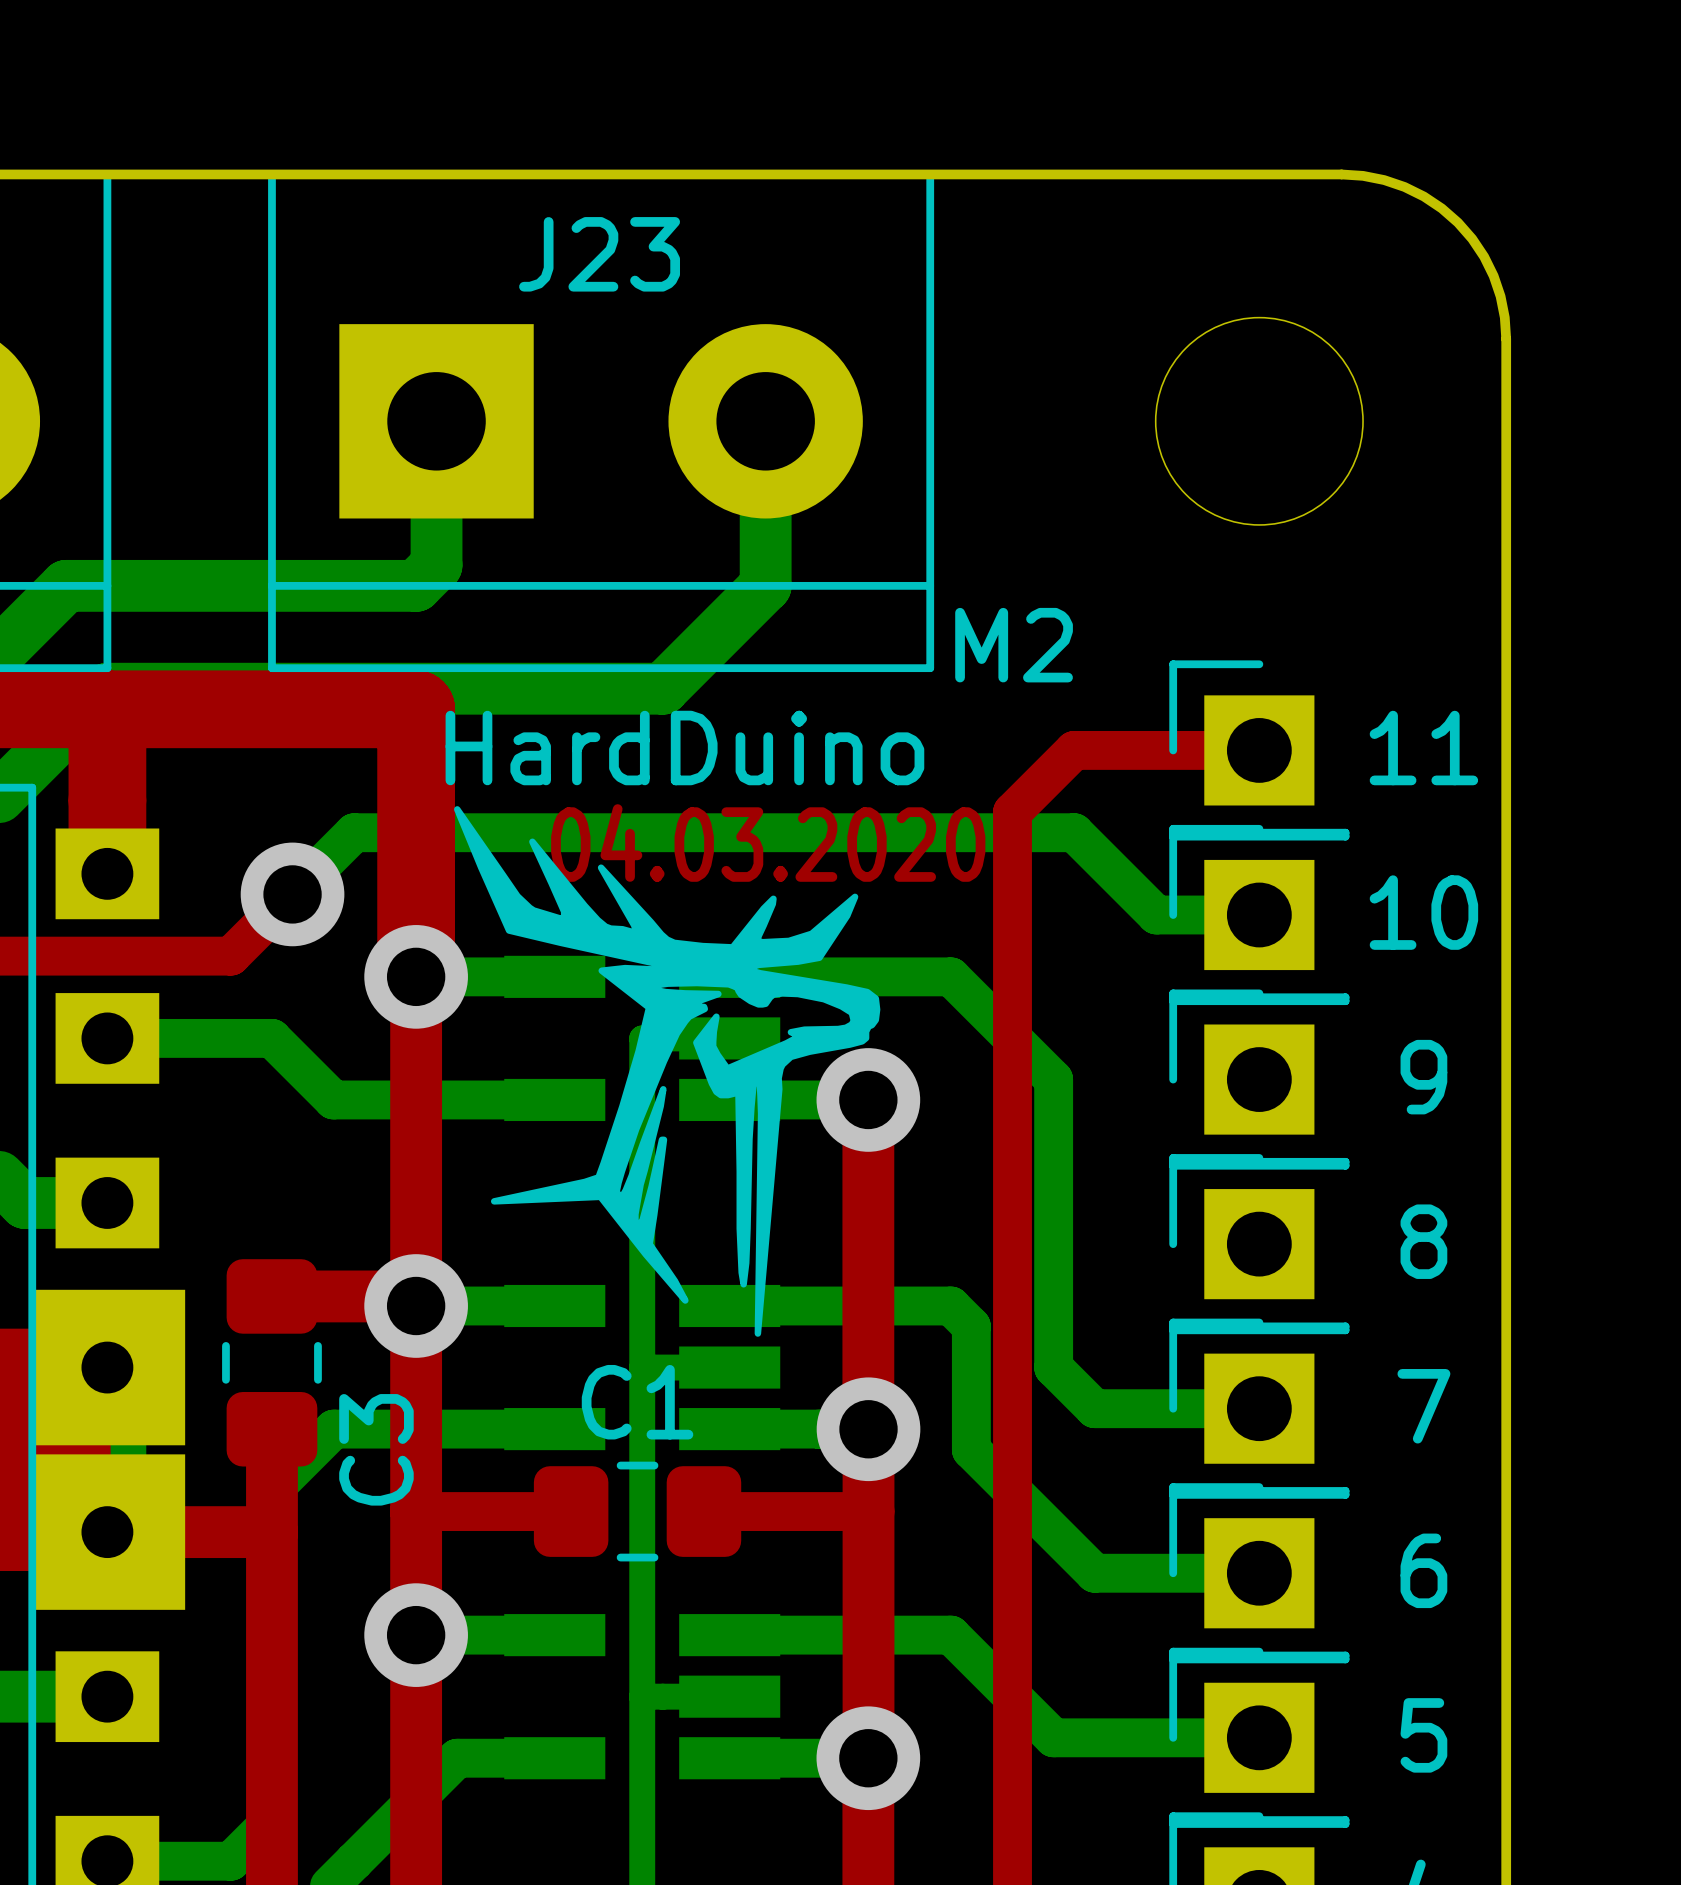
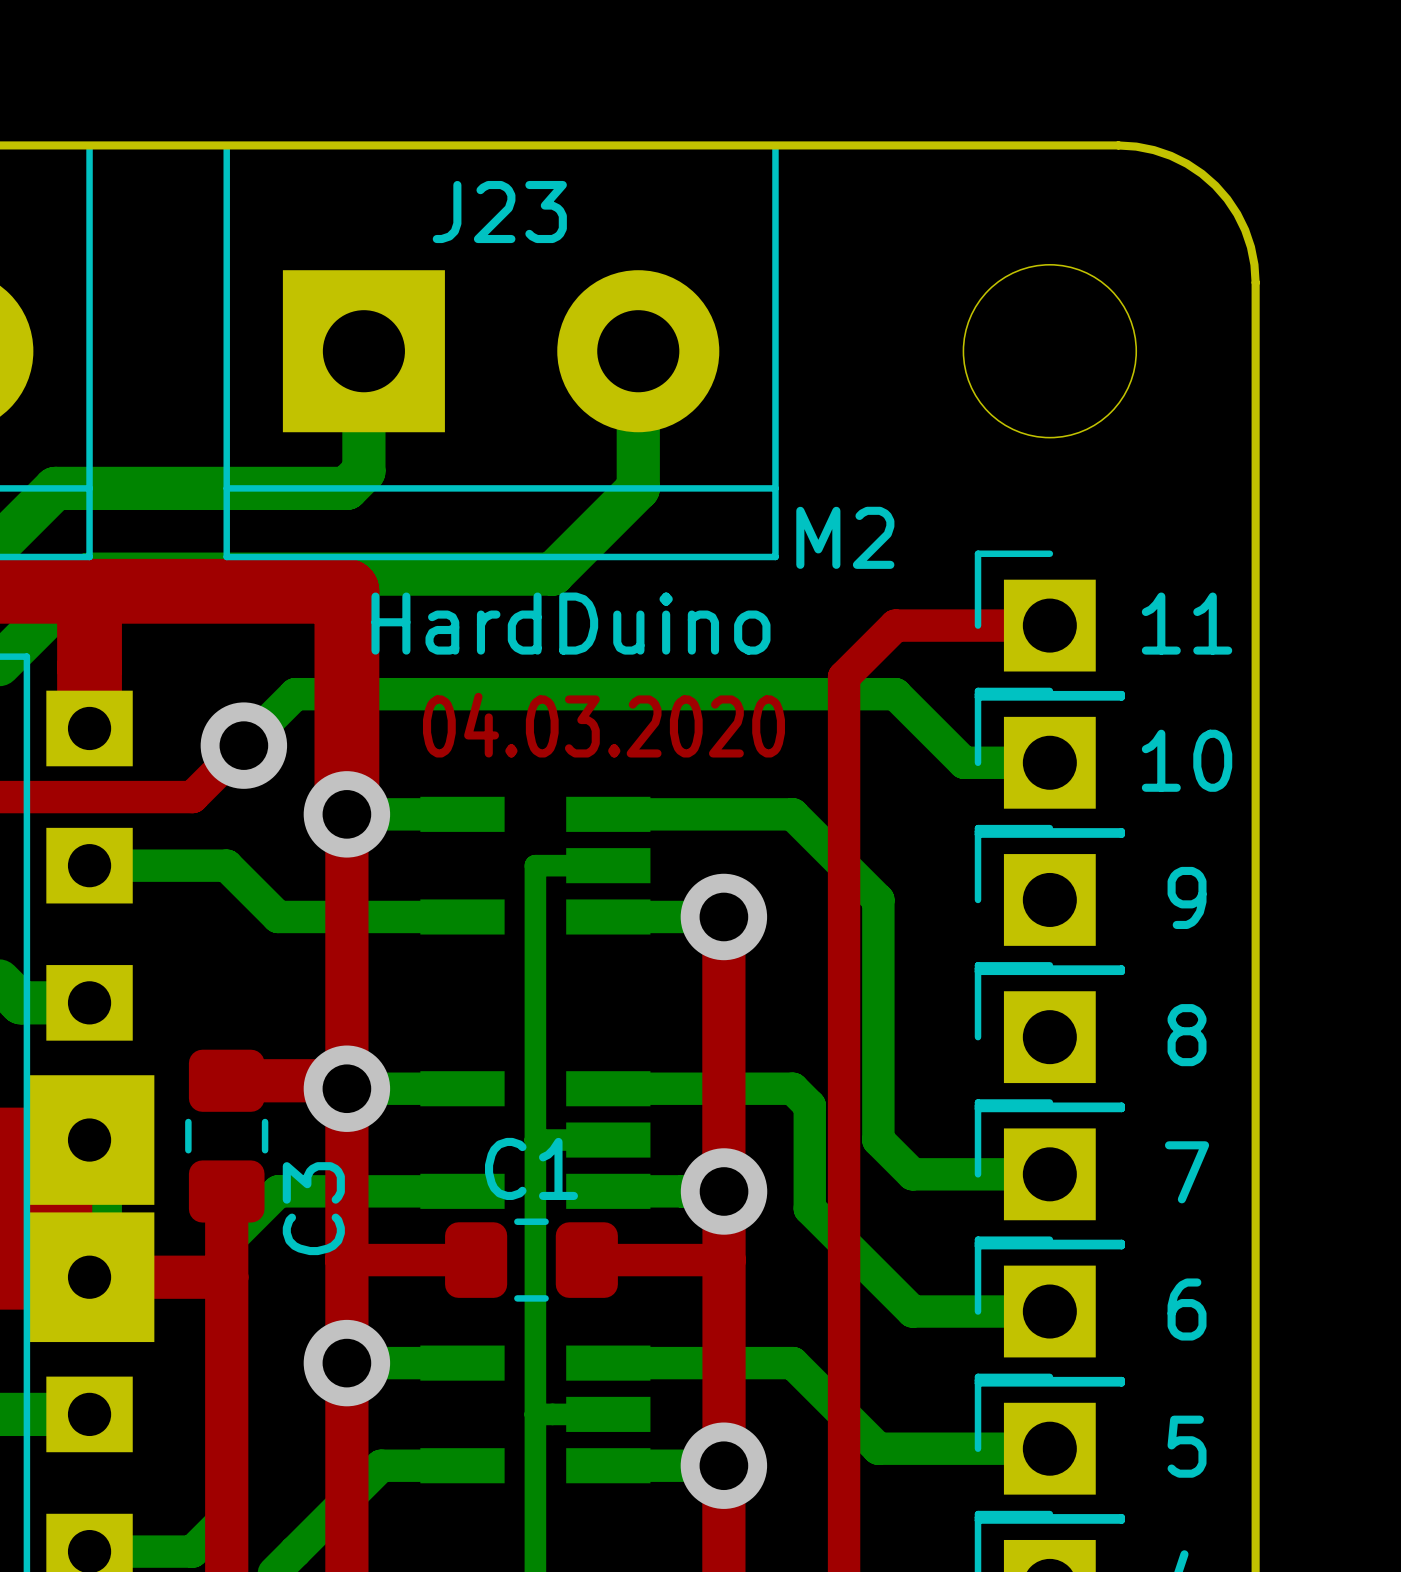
drawing: [454, 806, 881, 1337] -> none
text position: 04.03.2020 (768, 843) -> 04.03.2020 (603, 725)

